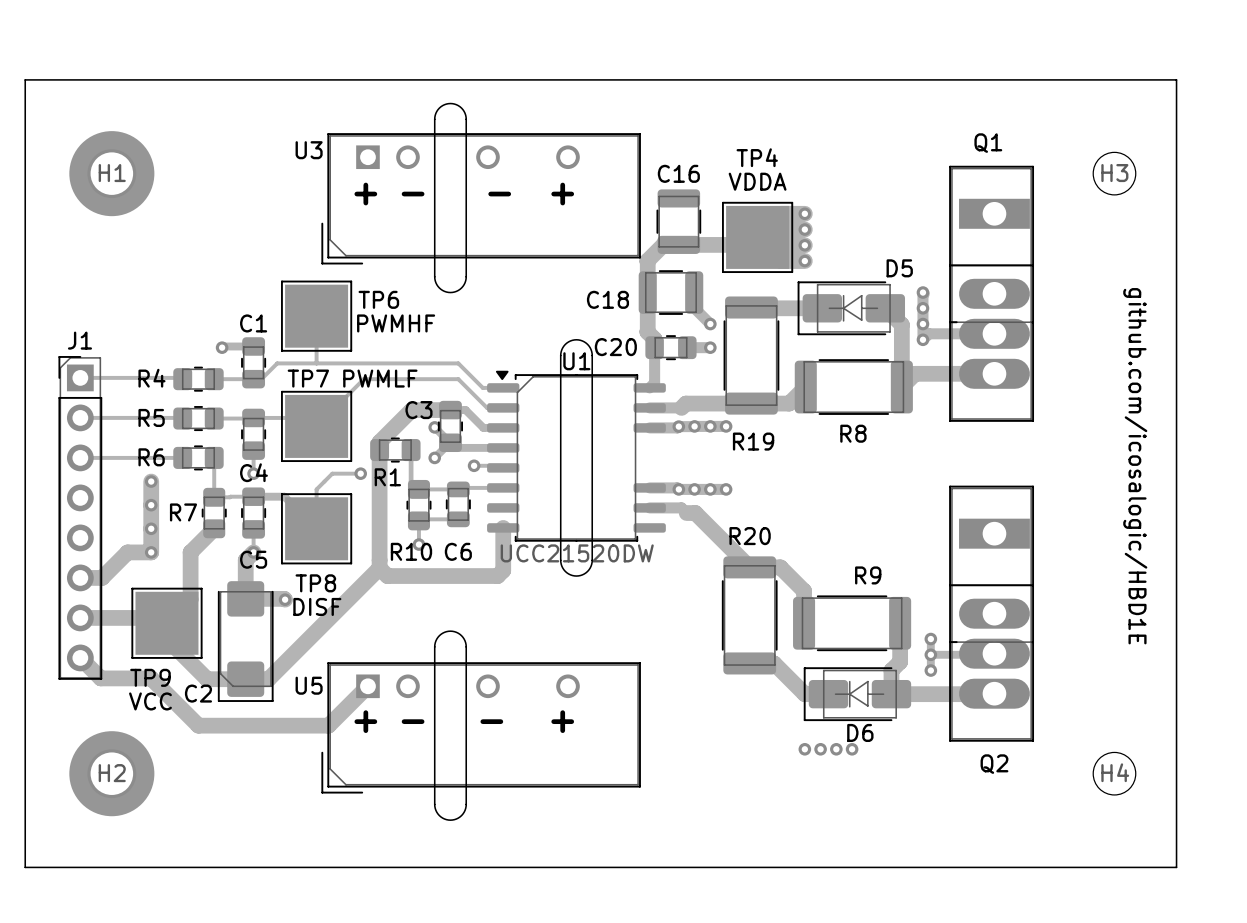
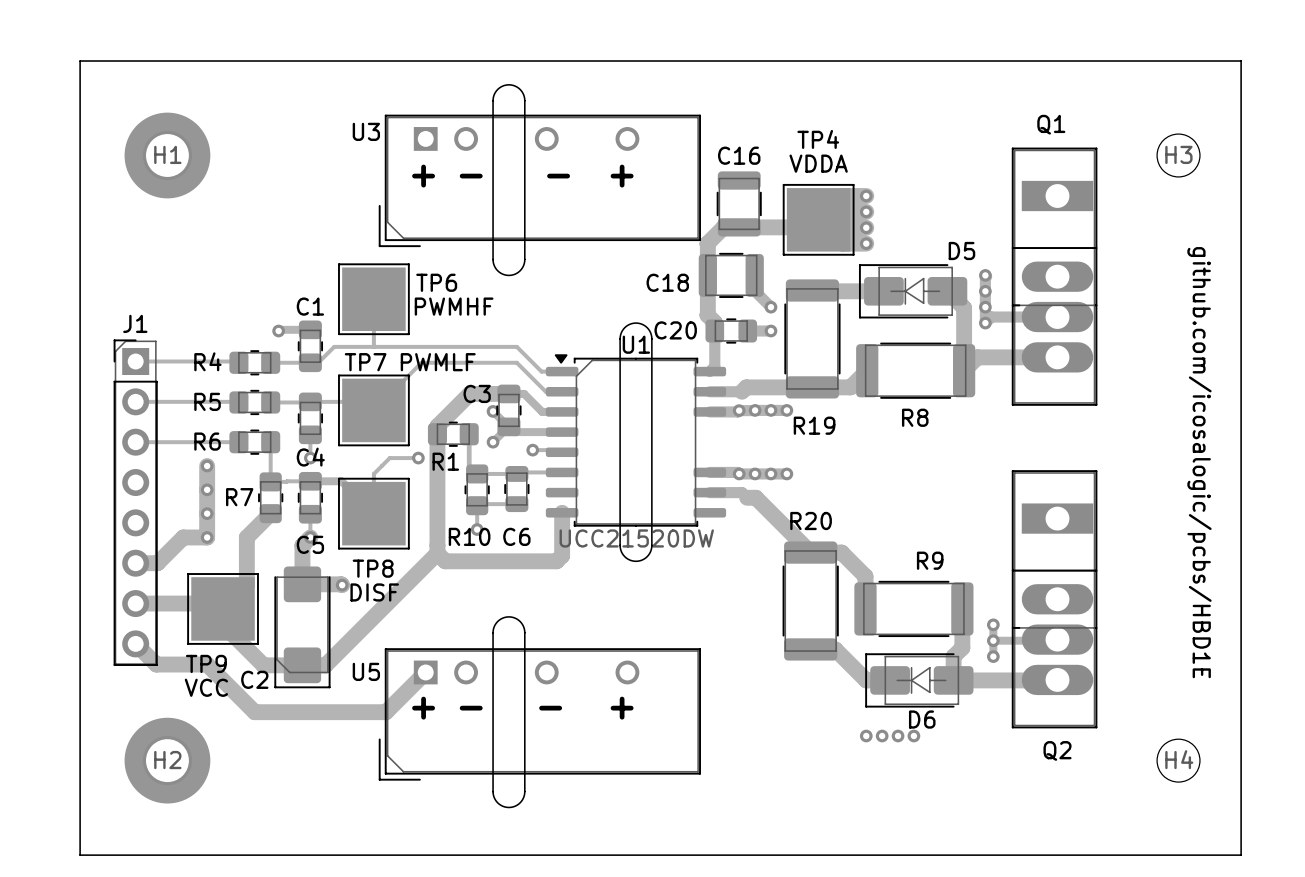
text: github.com/icosalogic/HBD1E (1135, 466) -> github.com/icosalogic/pcbs/HBD1E (1199, 462)

